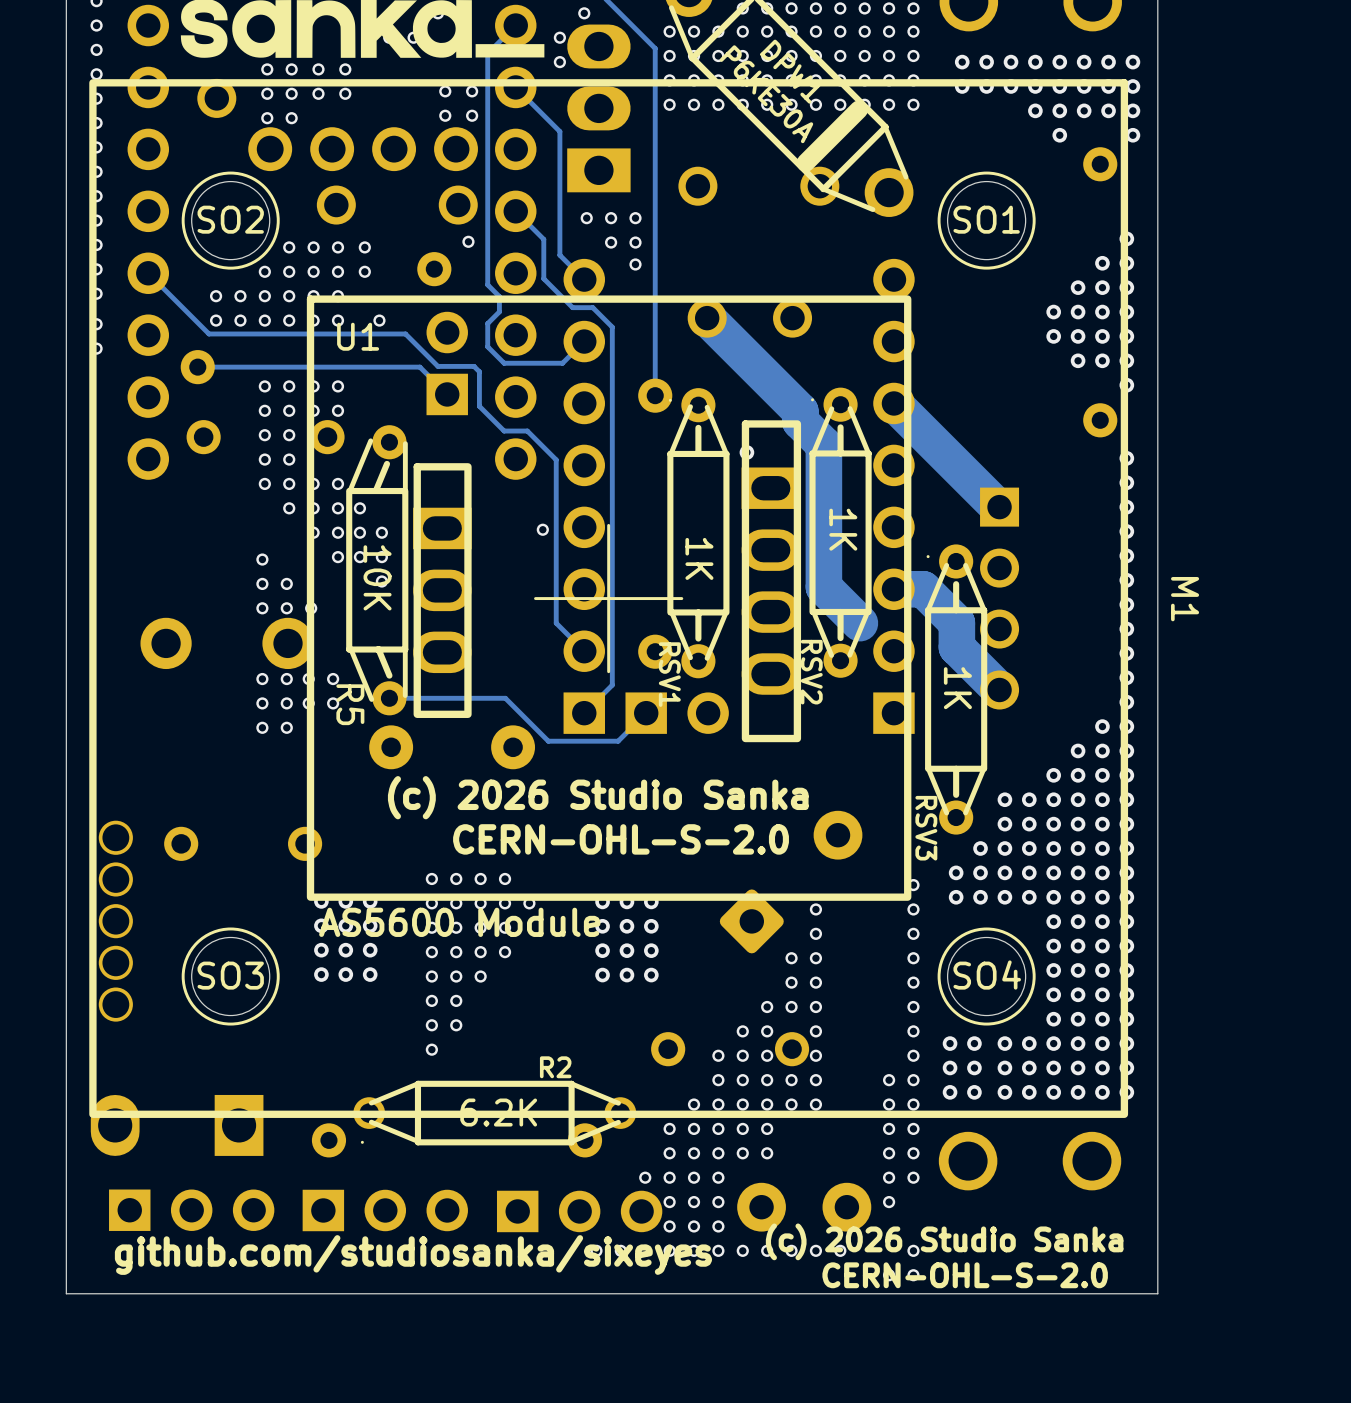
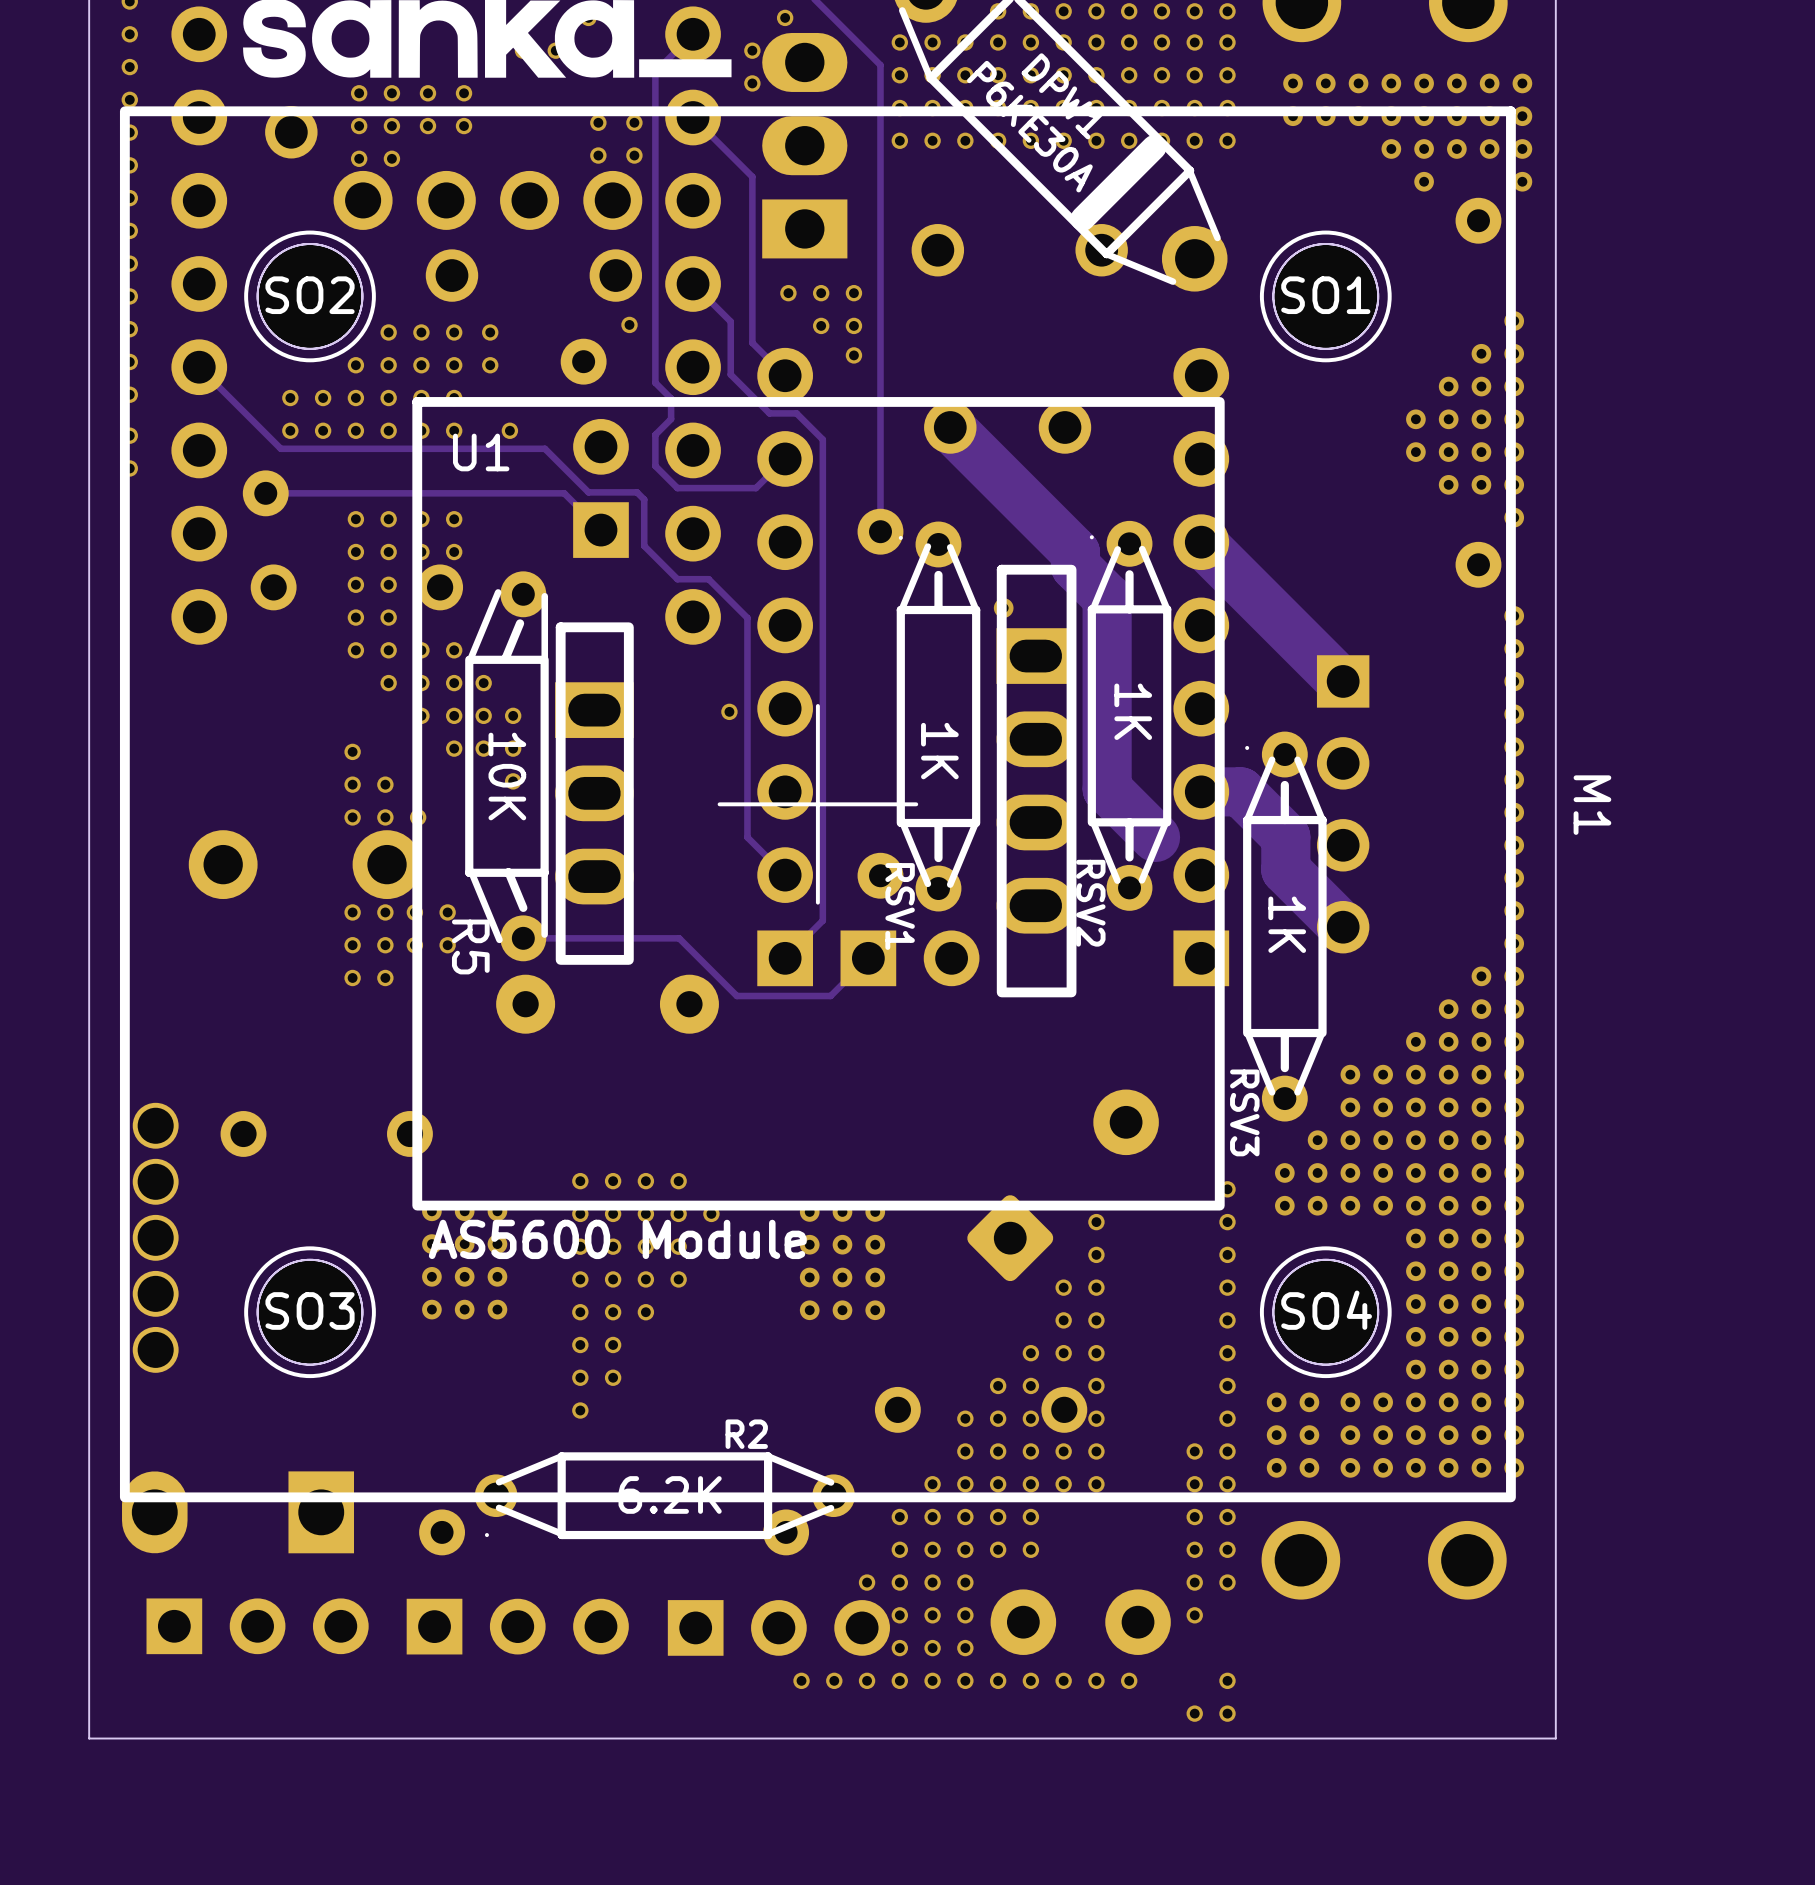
part: none -> (310, 296)
part: none -> (1325, 296)
text: (c) 2026 Studio Sanka (598, 797) -> none
text: CERN-OHL-S-2.0 (621, 839) -> none
part: none -> (310, 1312)
part: none -> (1325, 1312)
text: (c) 2026 Studio Sanka (944, 1241) -> none
text: github.com/studiosanka/sixeyes (413, 1255) -> none
text: CERN-OHL-S-2.0 (965, 1275) -> none

